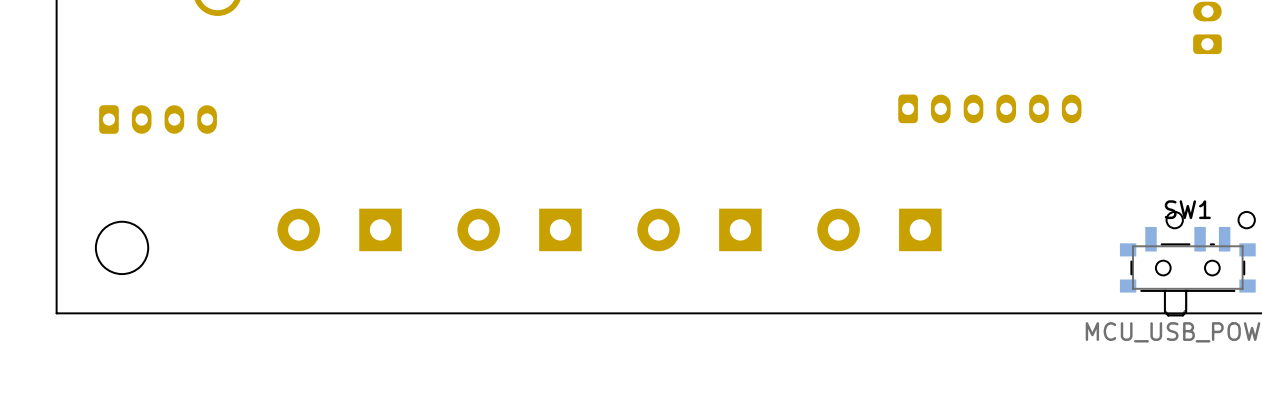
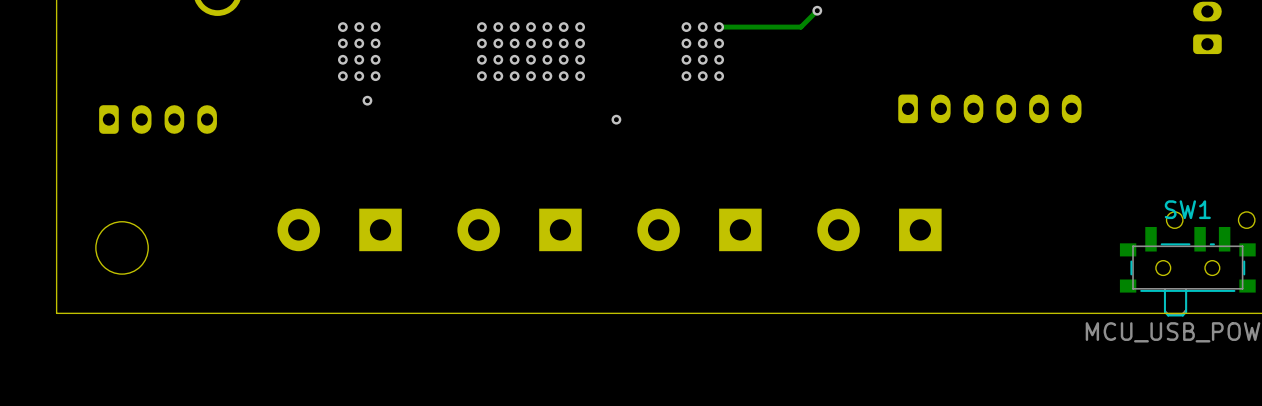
track: none -> (817, 10) (800, 27) (719, 27)
via: none -> (817, 10)
via: none -> (342, 27)
via: none -> (359, 27)
via: none -> (375, 27)
via: none -> (481, 27)
via: none -> (498, 27)
via: none -> (514, 27)
via: none -> (531, 27)
via: none -> (547, 27)
via: none -> (563, 27)
via: none -> (580, 27)
via: none -> (686, 27)
via: none -> (702, 27)
via: none -> (719, 27)
via: none -> (342, 43)
via: none -> (359, 43)
via: none -> (375, 43)
via: none -> (481, 43)
via: none -> (498, 43)
via: none -> (514, 43)
via: none -> (531, 43)
via: none -> (547, 43)
via: none -> (563, 43)
via: none -> (580, 43)
via: none -> (686, 43)
via: none -> (702, 43)
via: none -> (719, 43)
via: none -> (342, 59)
via: none -> (359, 59)
via: none -> (375, 59)
via: none -> (481, 59)
via: none -> (498, 59)
via: none -> (514, 59)
via: none -> (531, 59)
via: none -> (547, 59)
via: none -> (563, 59)
via: none -> (580, 59)
via: none -> (686, 59)
via: none -> (702, 59)
via: none -> (719, 59)
via: none -> (342, 76)
via: none -> (359, 76)
via: none -> (375, 76)
via: none -> (481, 76)
via: none -> (498, 76)
via: none -> (514, 76)
via: none -> (531, 76)
via: none -> (547, 76)
via: none -> (563, 76)
via: none -> (580, 76)
via: none -> (686, 76)
via: none -> (702, 76)
via: none -> (719, 76)
via: none -> (367, 100)
via: none -> (616, 119)

